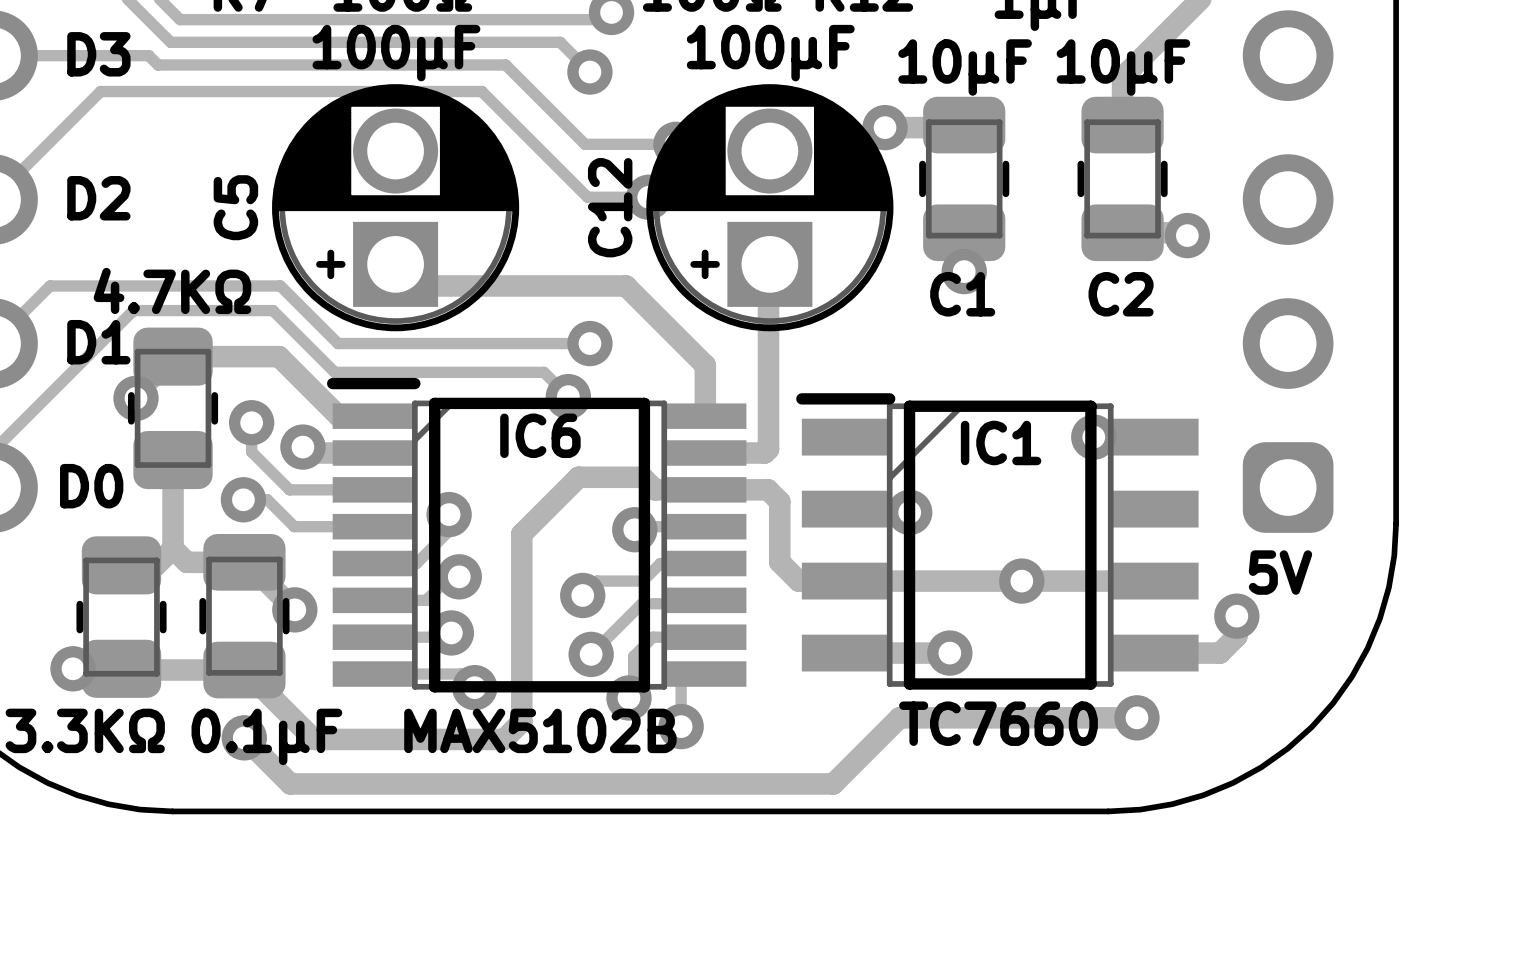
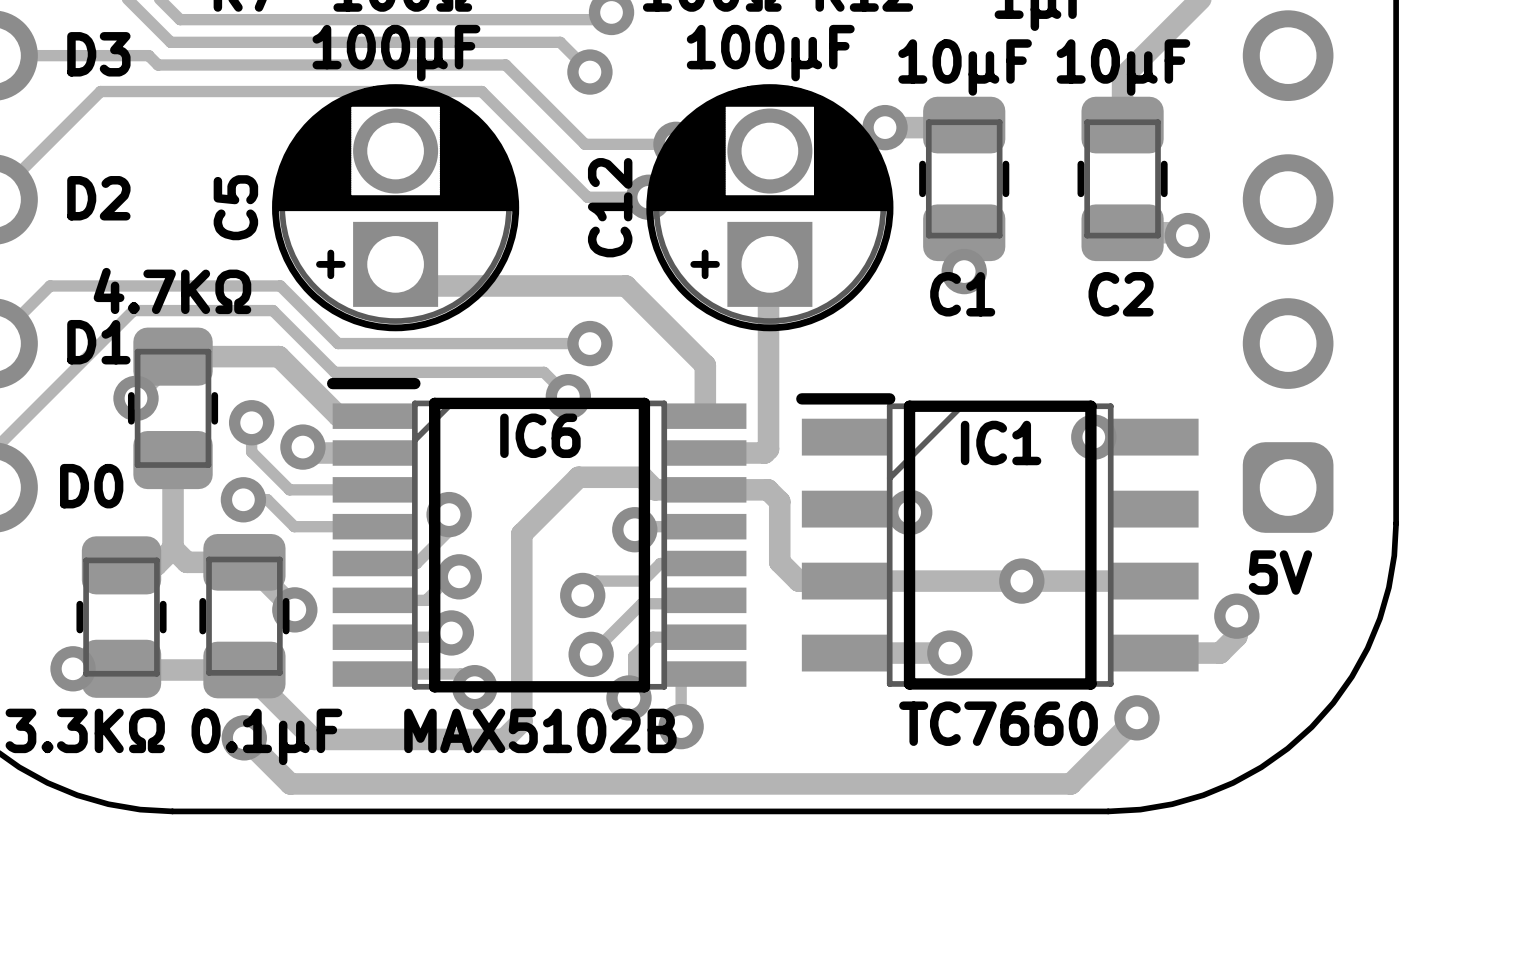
track: (1136, 717) (899, 717) (833, 783) -> (1136, 717) (1070, 783) (833, 783)

